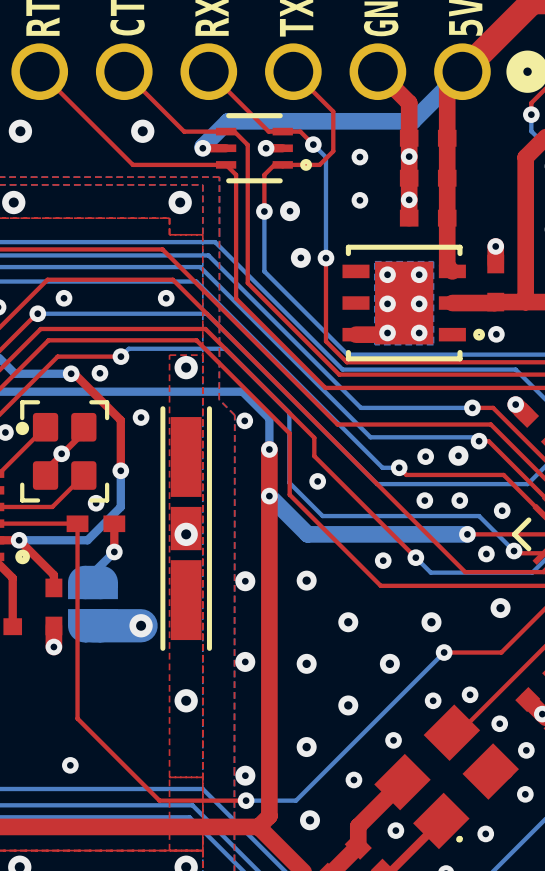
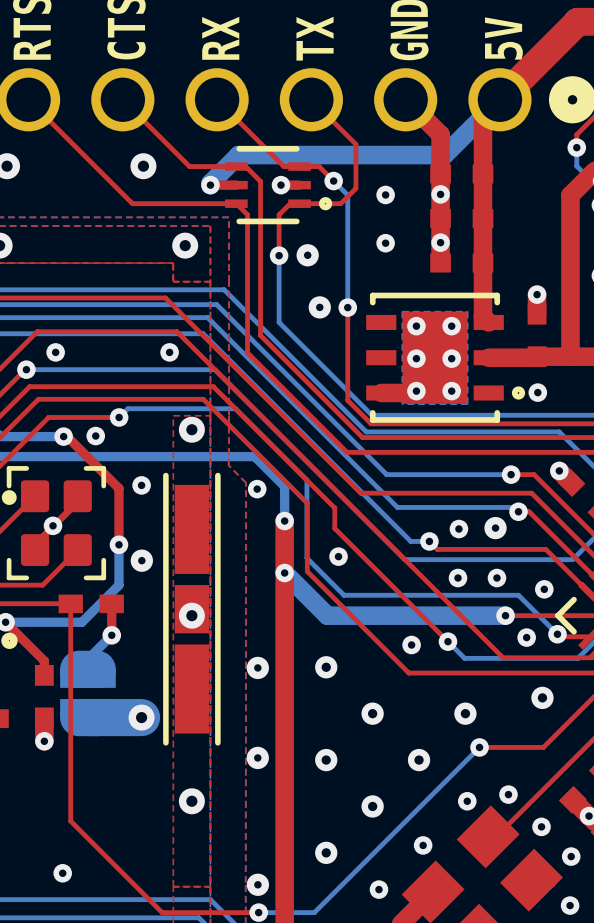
via: none -> (141, 560)
via: (96, 503) -> none

